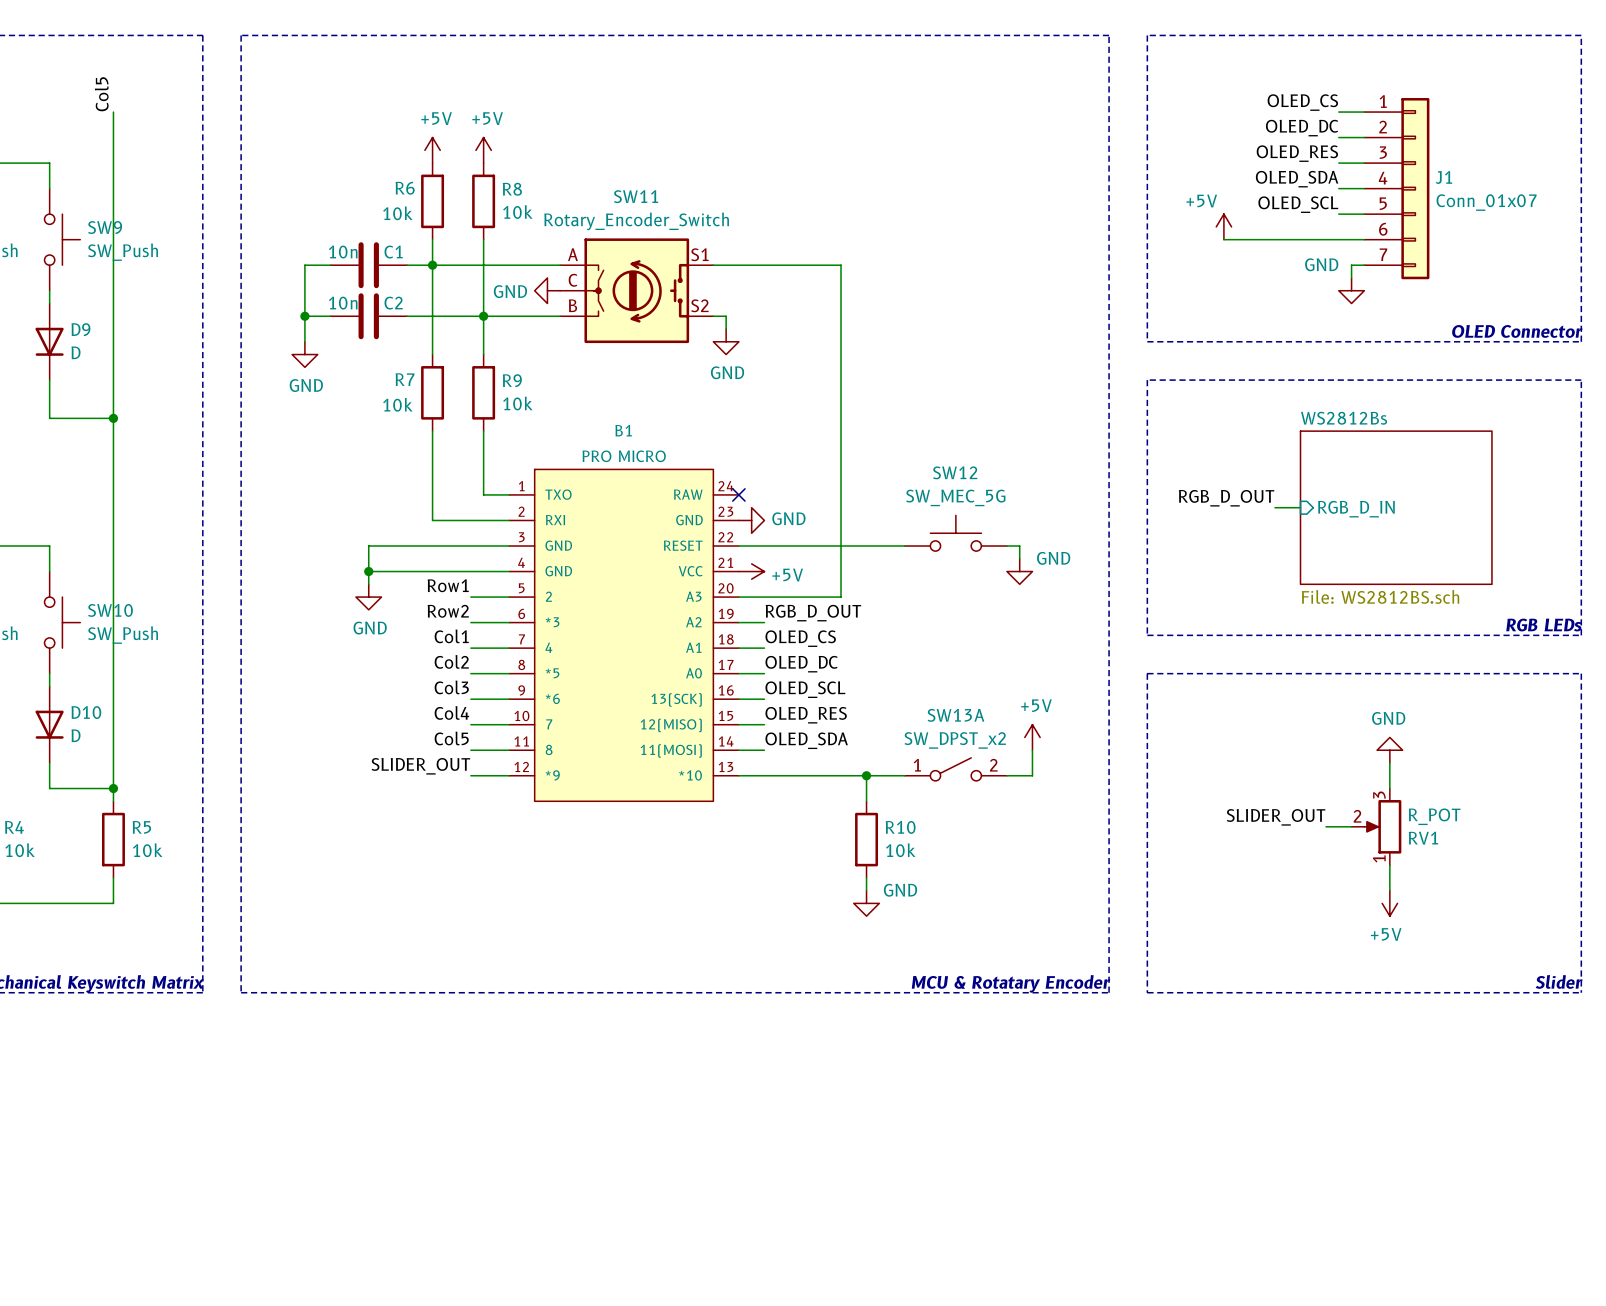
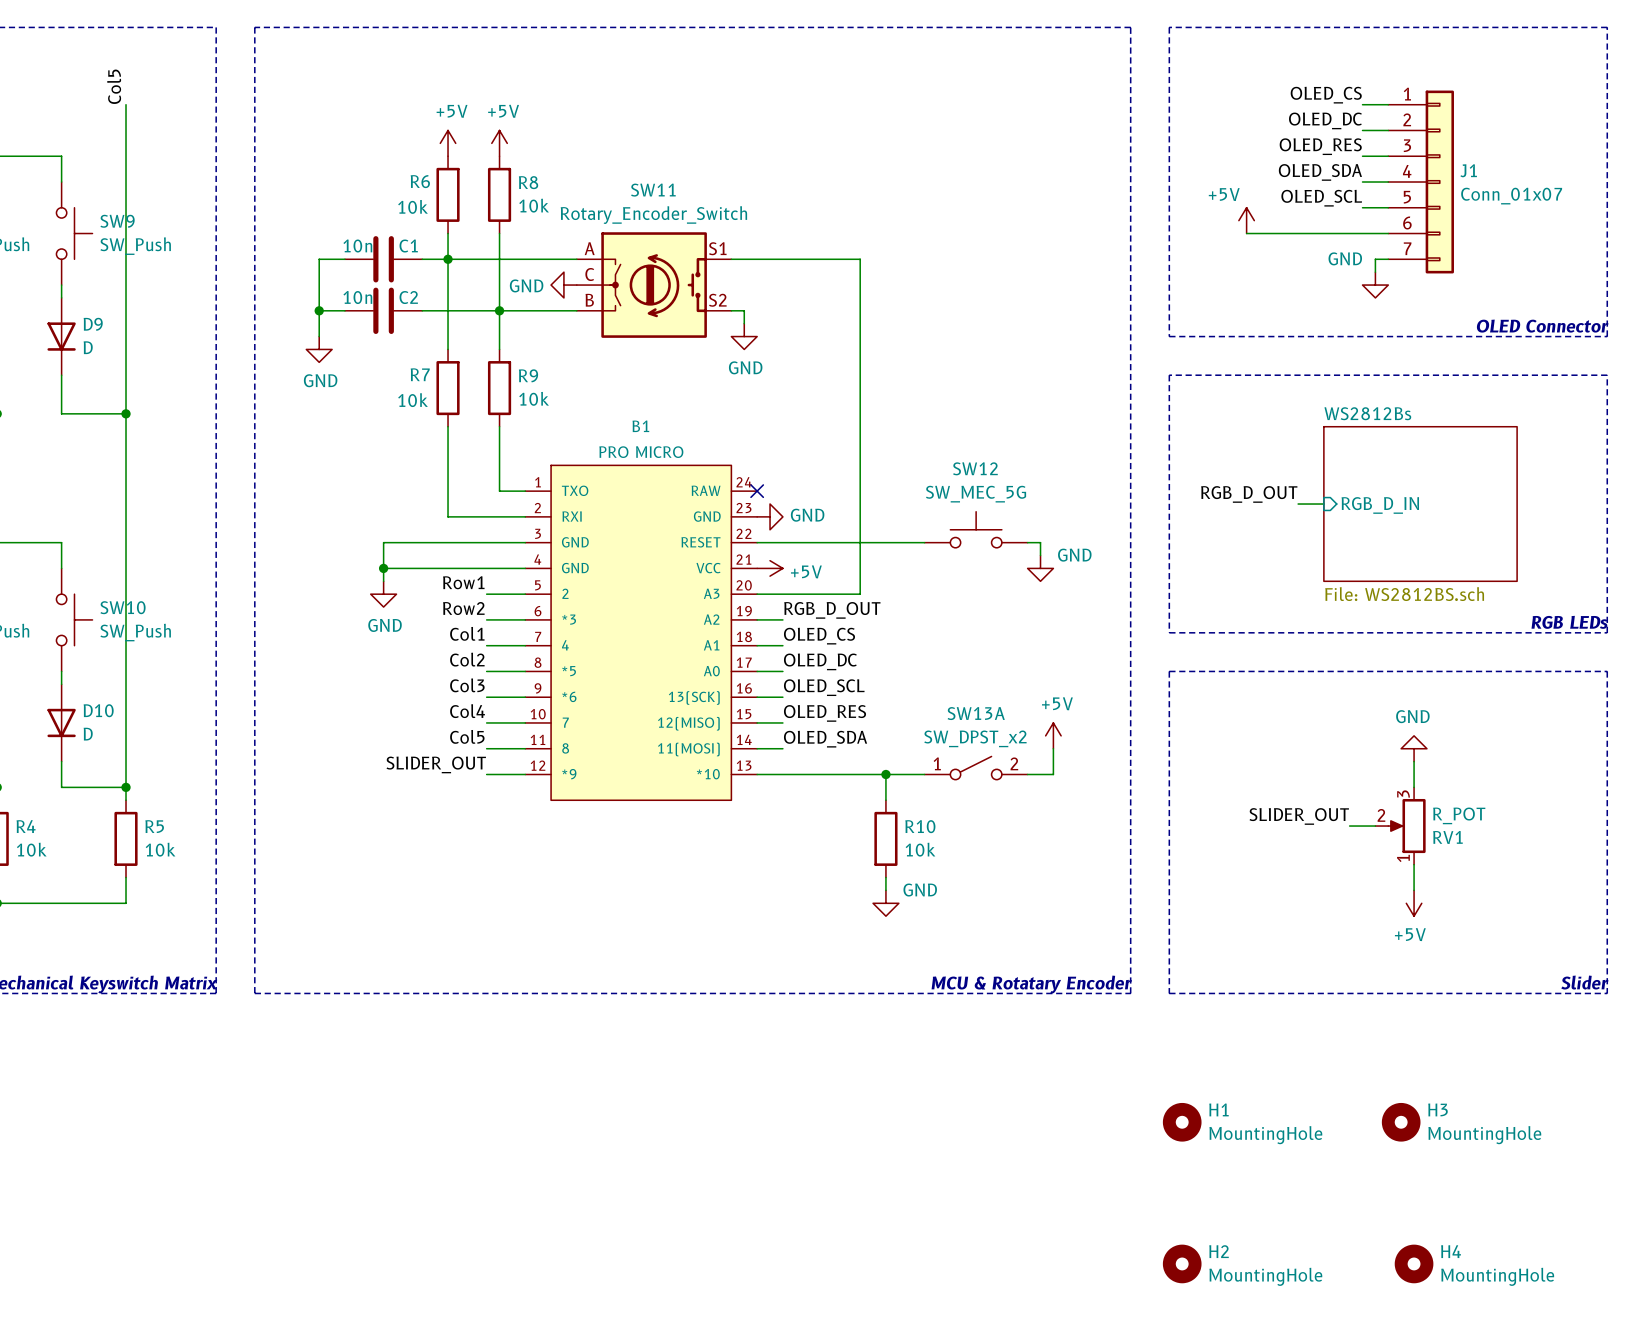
H1: none -> MountingHole (1182, 1122)
H3: none -> MountingHole (1401, 1122)
H2: none -> MountingHole (1182, 1263)
H4: none -> MountingHole (1414, 1263)

